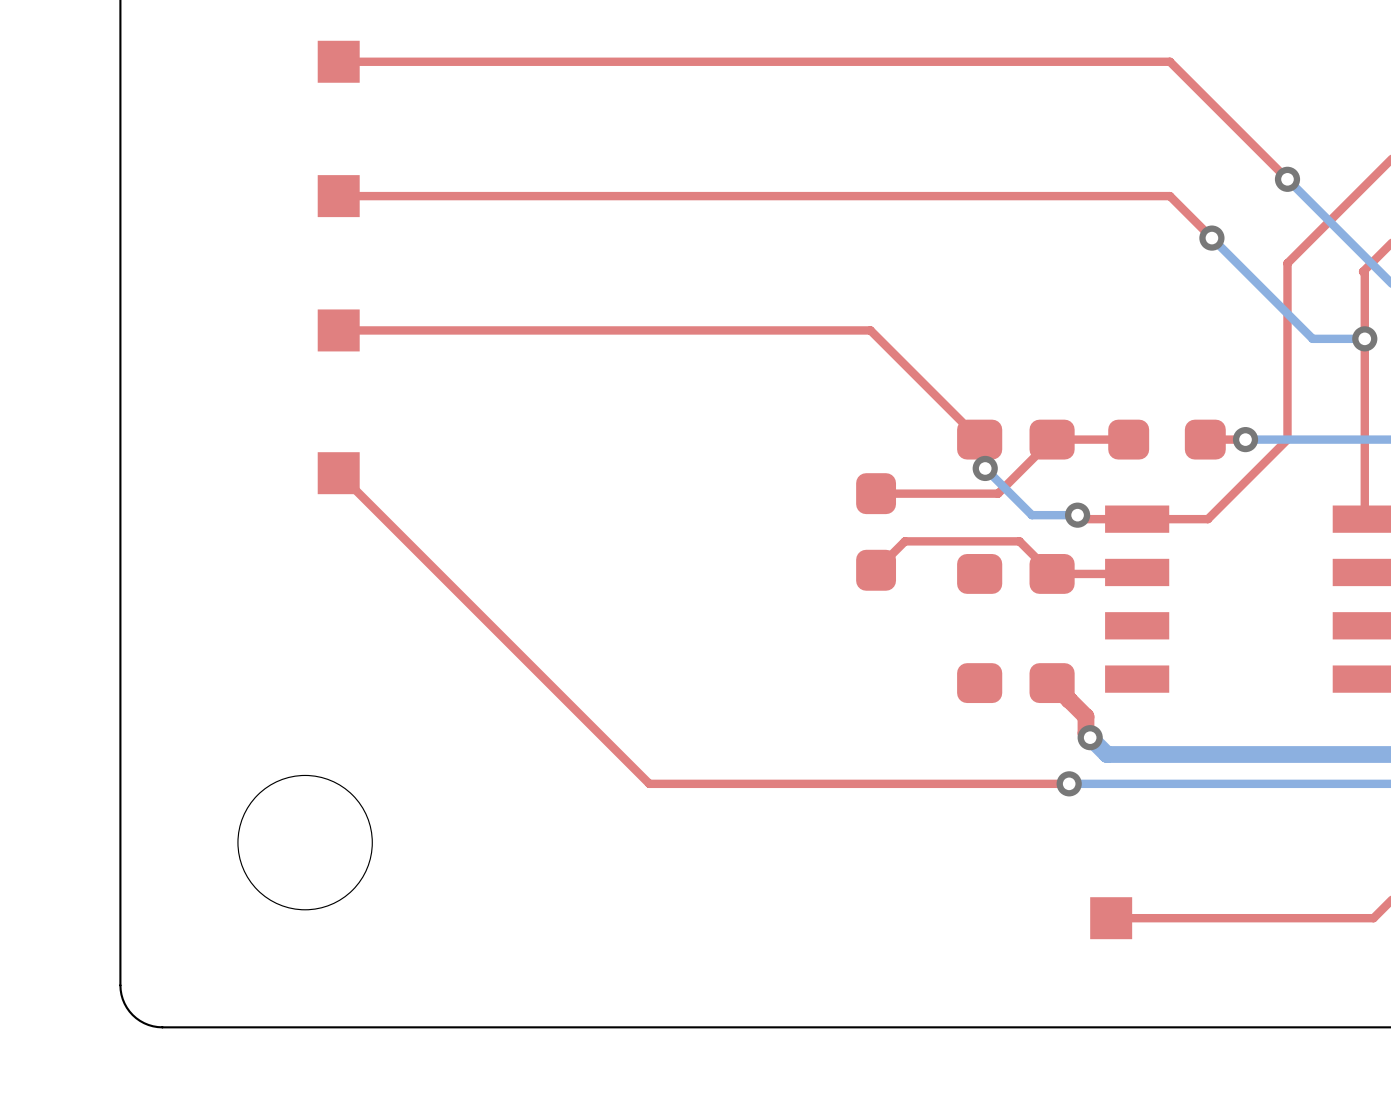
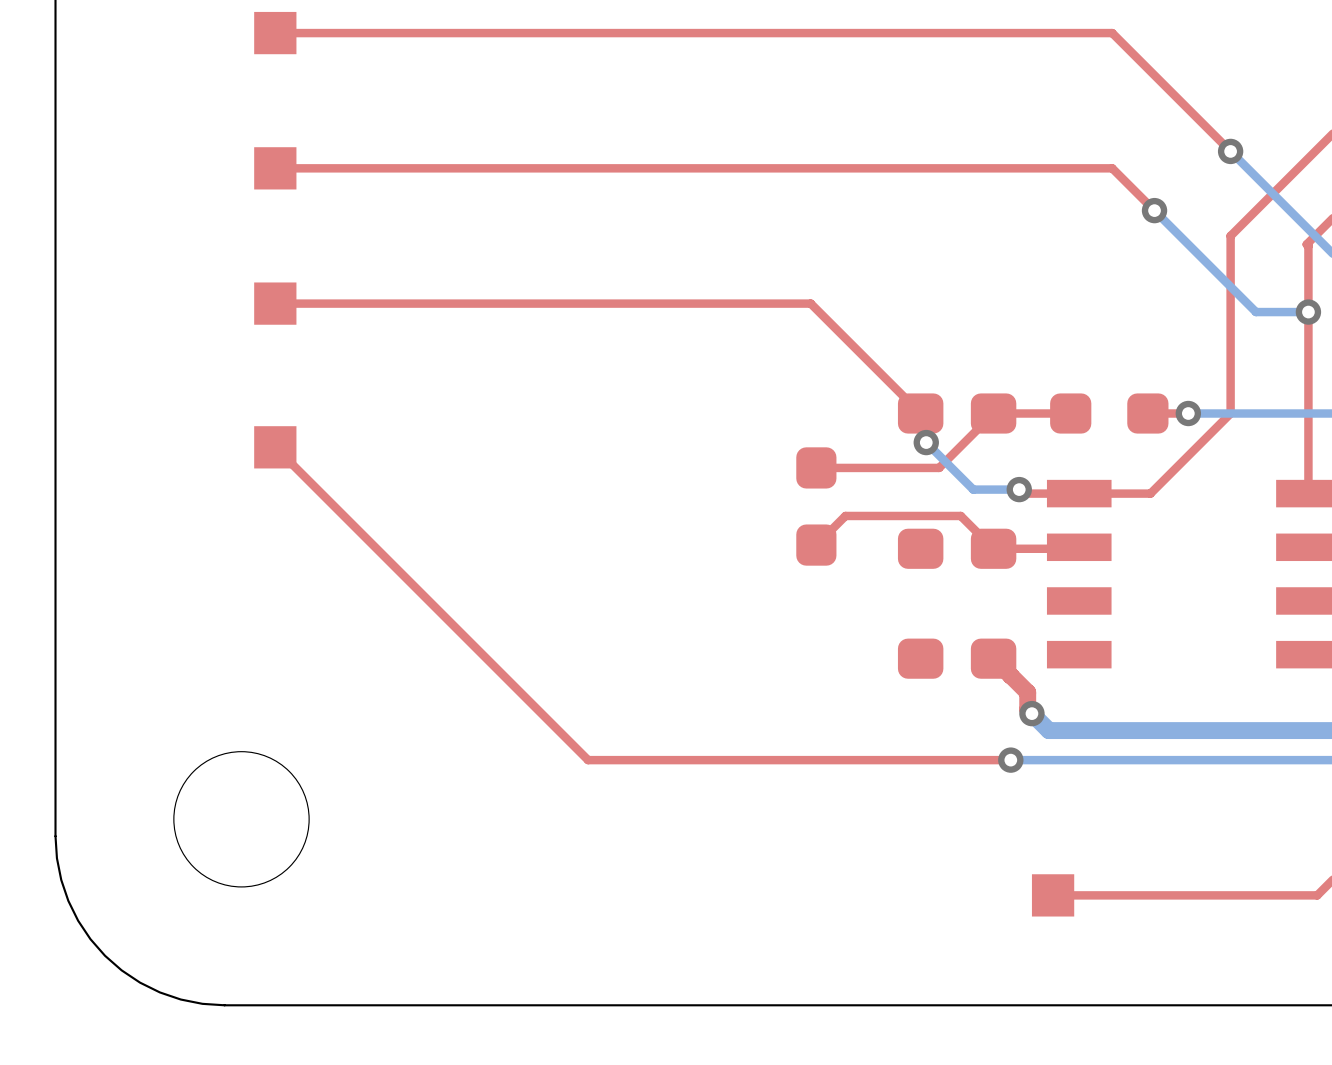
board edge: (120, 859) (120, 990) (124, 1003) (132, 1015) (144, 1023) (157, 1027) (288, 1027) -> (55, 836) (61, 879) (68, 900) (90, 939) (105, 955) (140, 982) (159, 992) (180, 999) (224, 1005)

